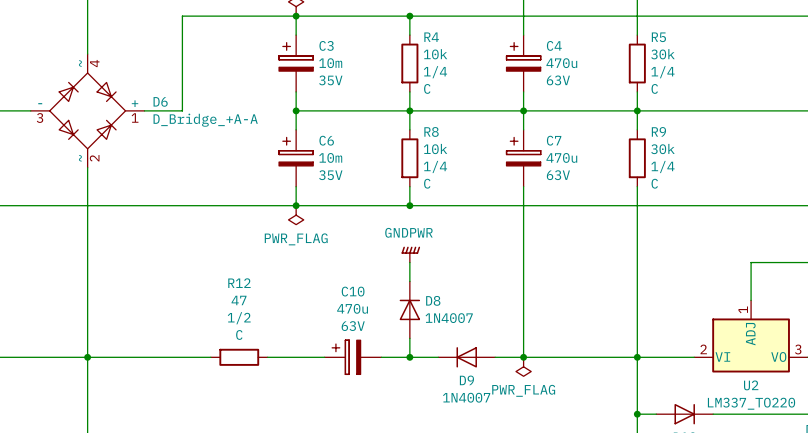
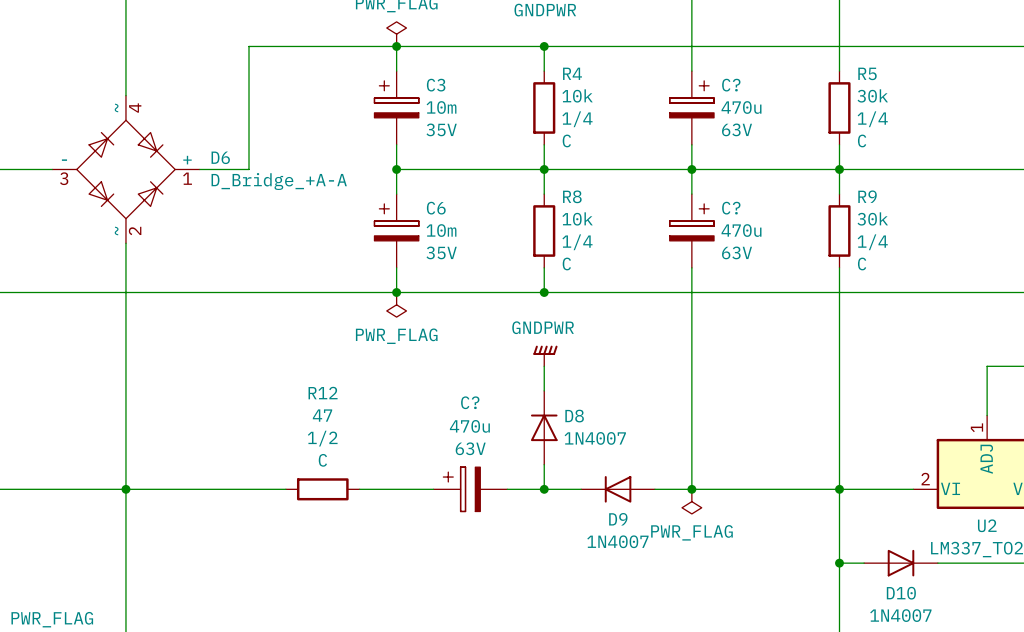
C4: 470u (523, 63) -> none
C?: none -> 470u (691, 107)
C7: 470u (523, 158) -> none
C?: none -> 470u (691, 230)
C10 name: C10 (353, 291) -> C? (470, 402)

